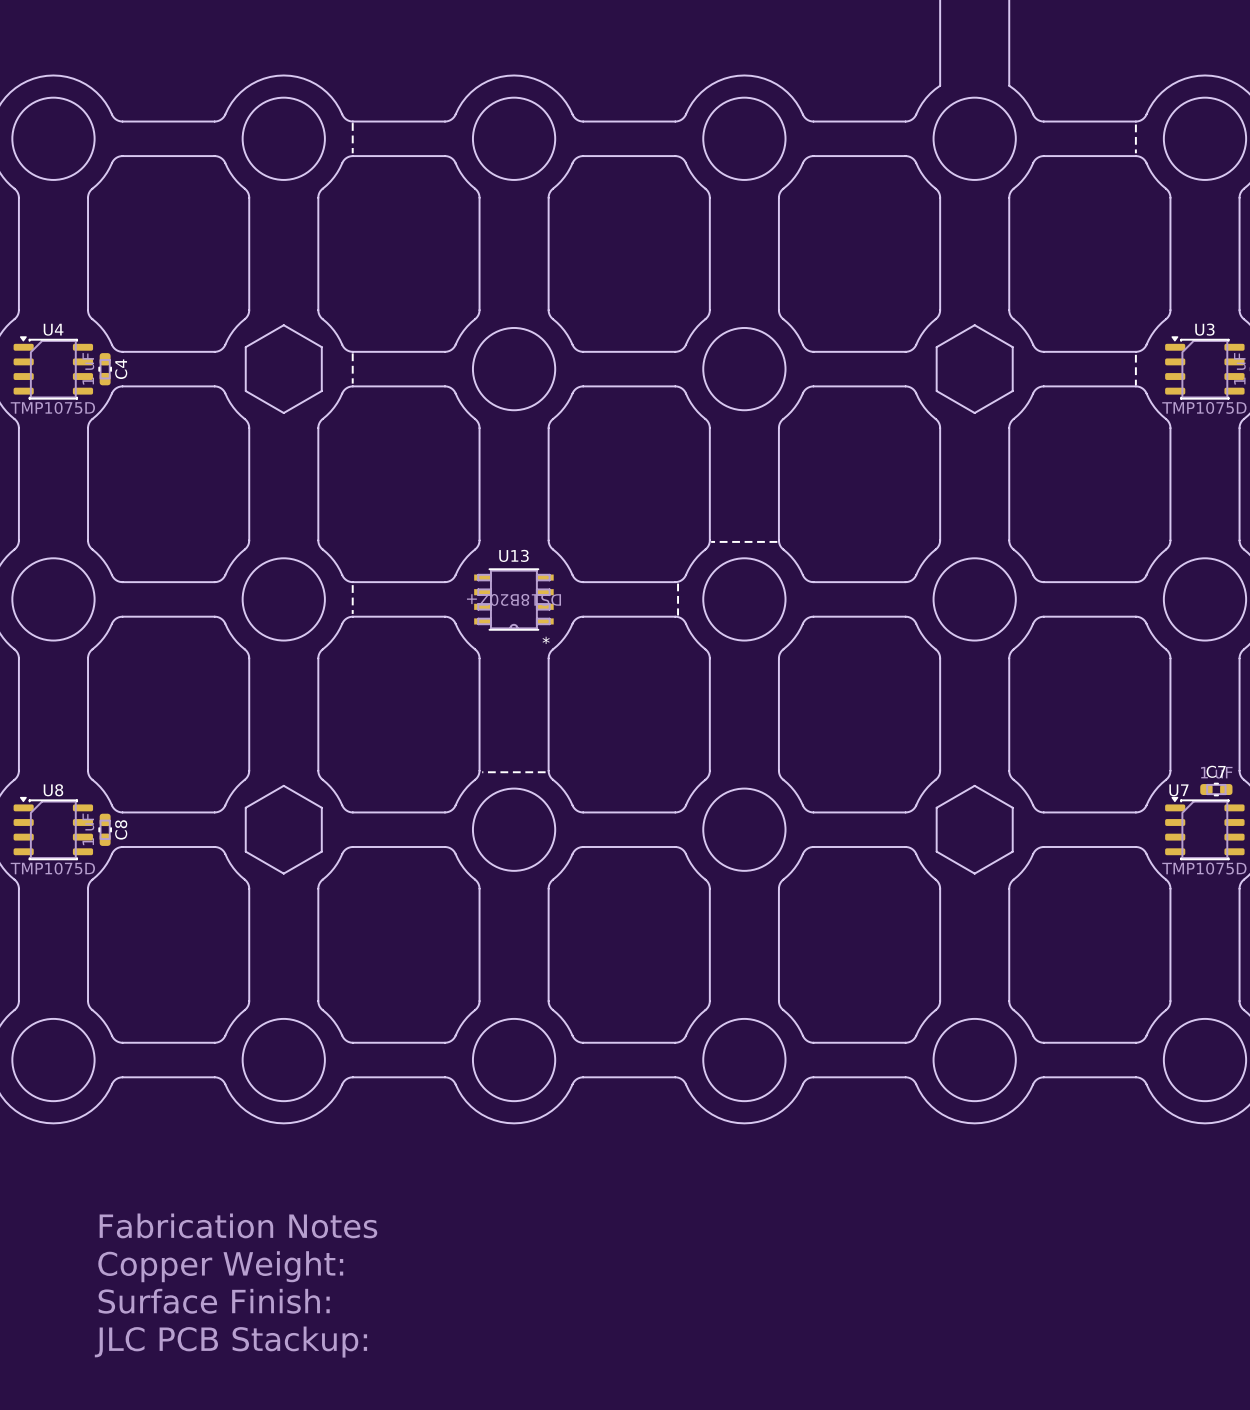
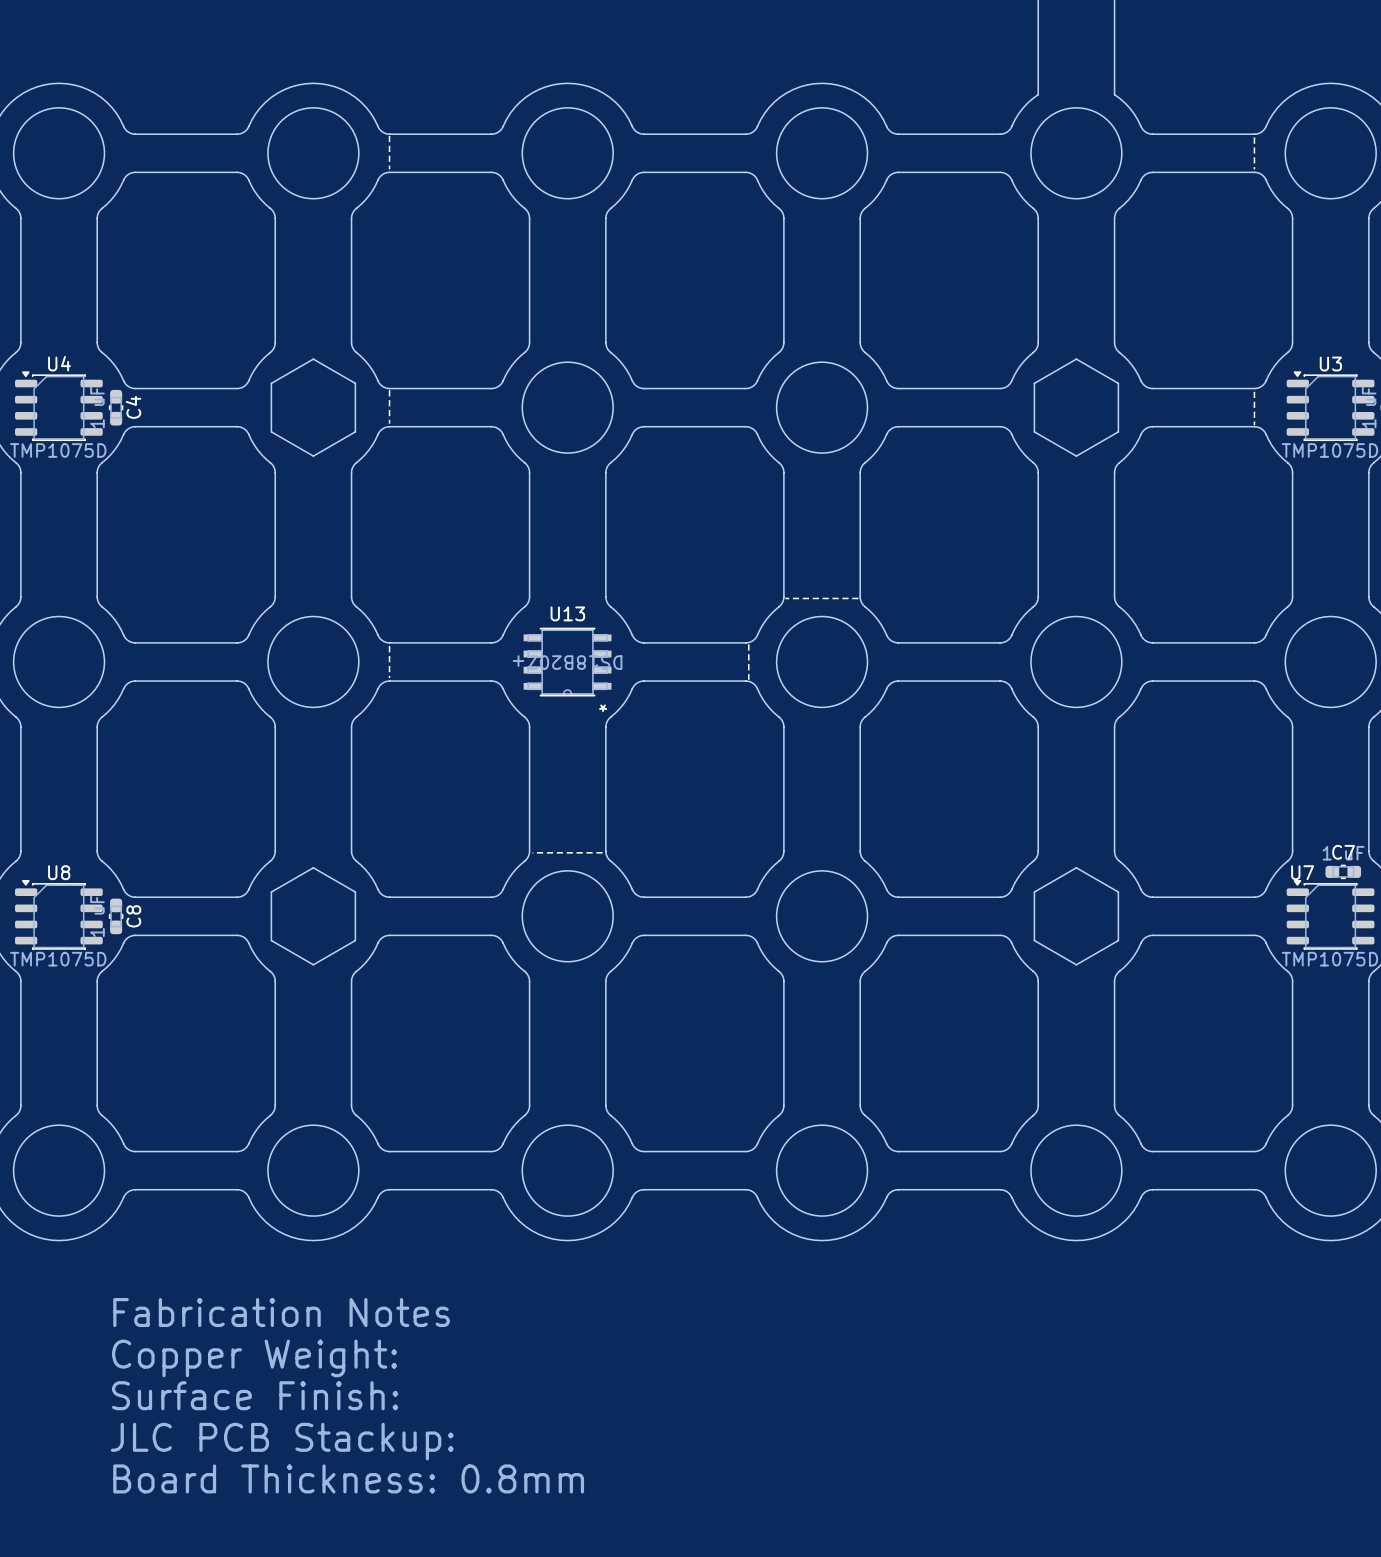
text: none -> Fabrication Notes (281, 1312)
text: Fabrication Notes (238, 1225) -> Copper Weight: (254, 1358)
text: Copper Weight: (220, 1266) -> Surface Finish: (255, 1395)
text: Surface Finish: (214, 1301) -> JLC PCB Stackup: (282, 1441)
text: JLC PCB Stackup: (230, 1342) -> Board Thickness: 0.8mm (348, 1478)

